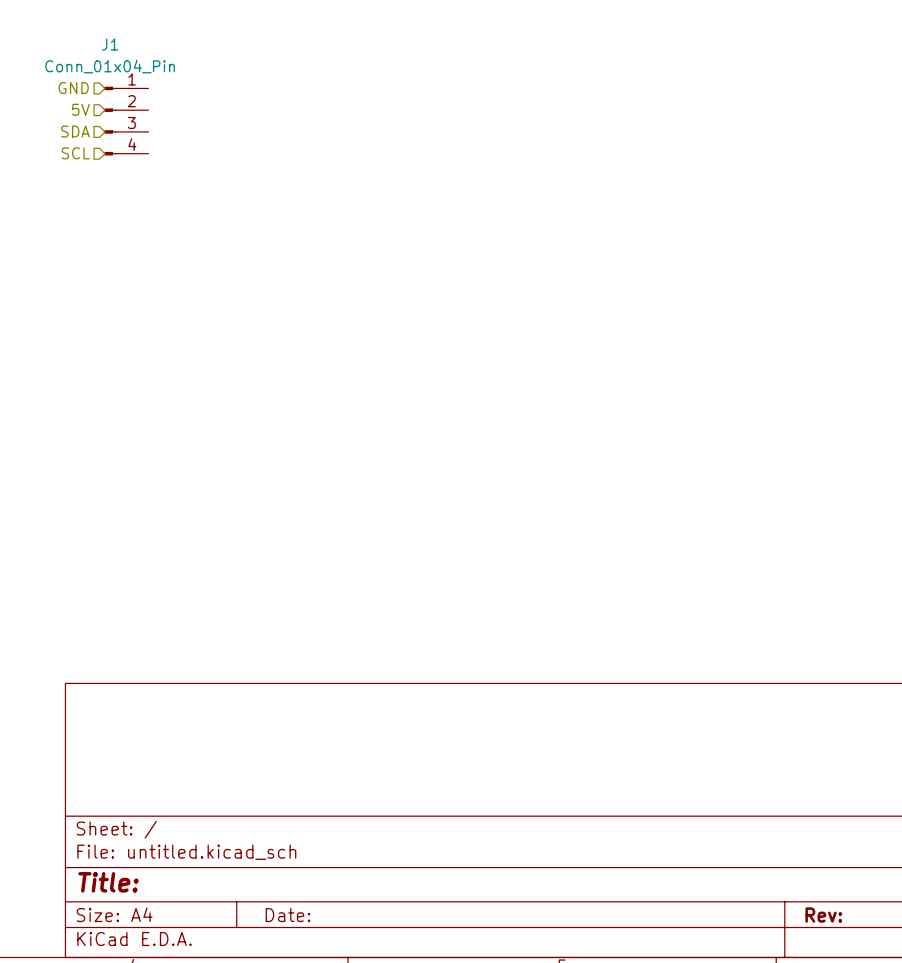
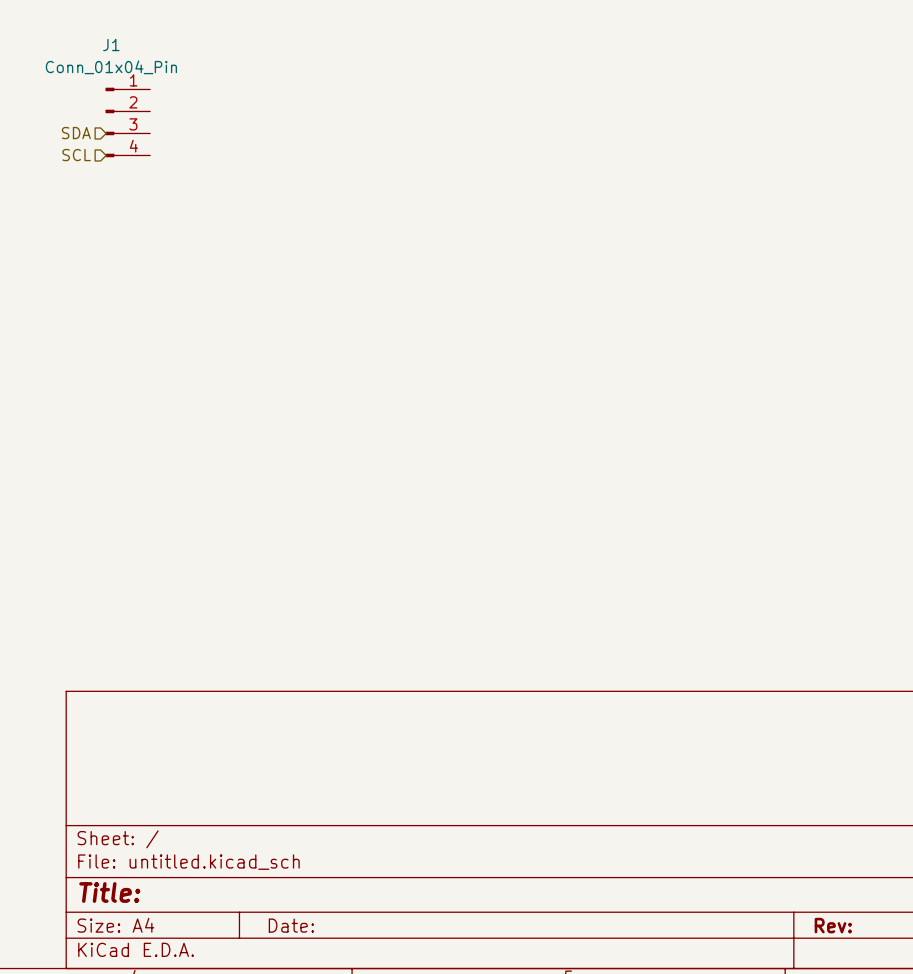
hierarchical label: GND (73, 88) -> none
hierarchical label: 5V (80, 109) -> none

